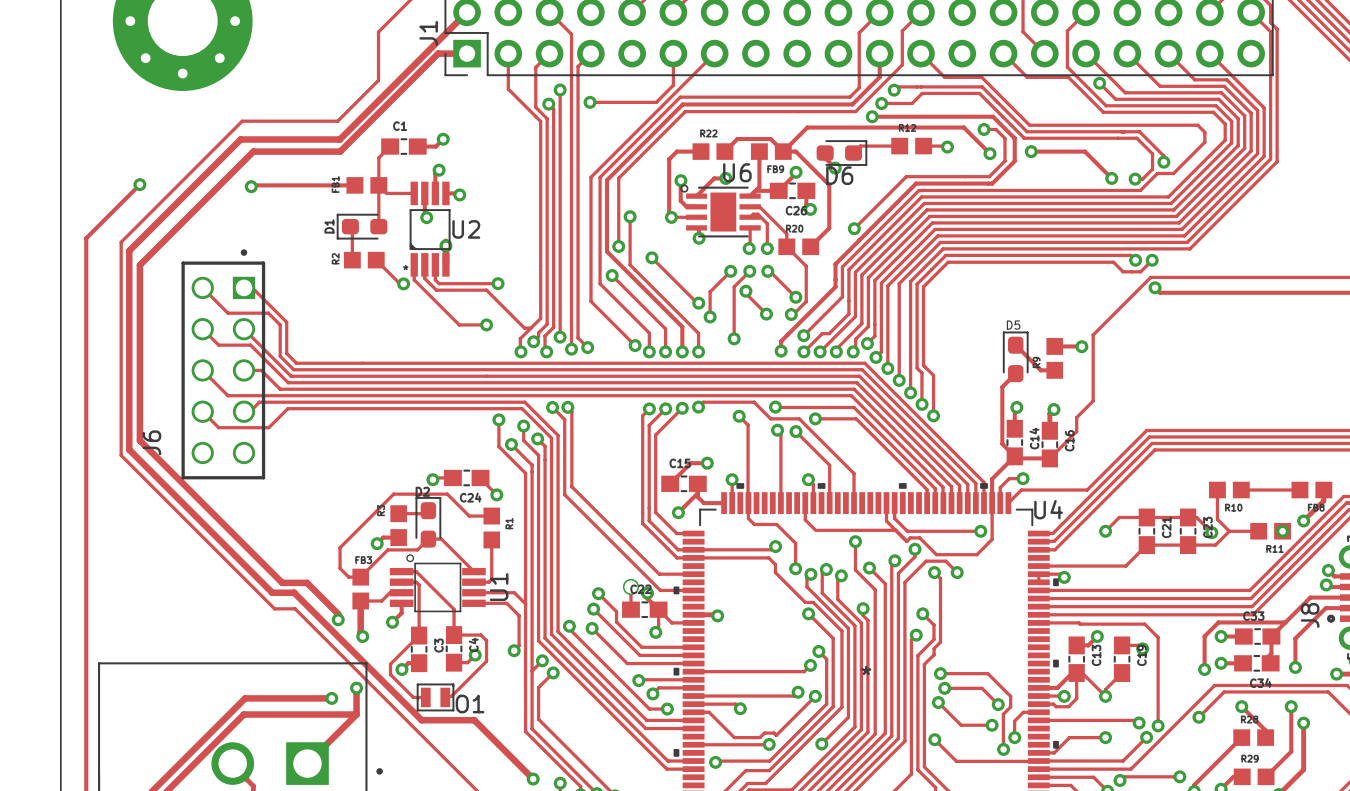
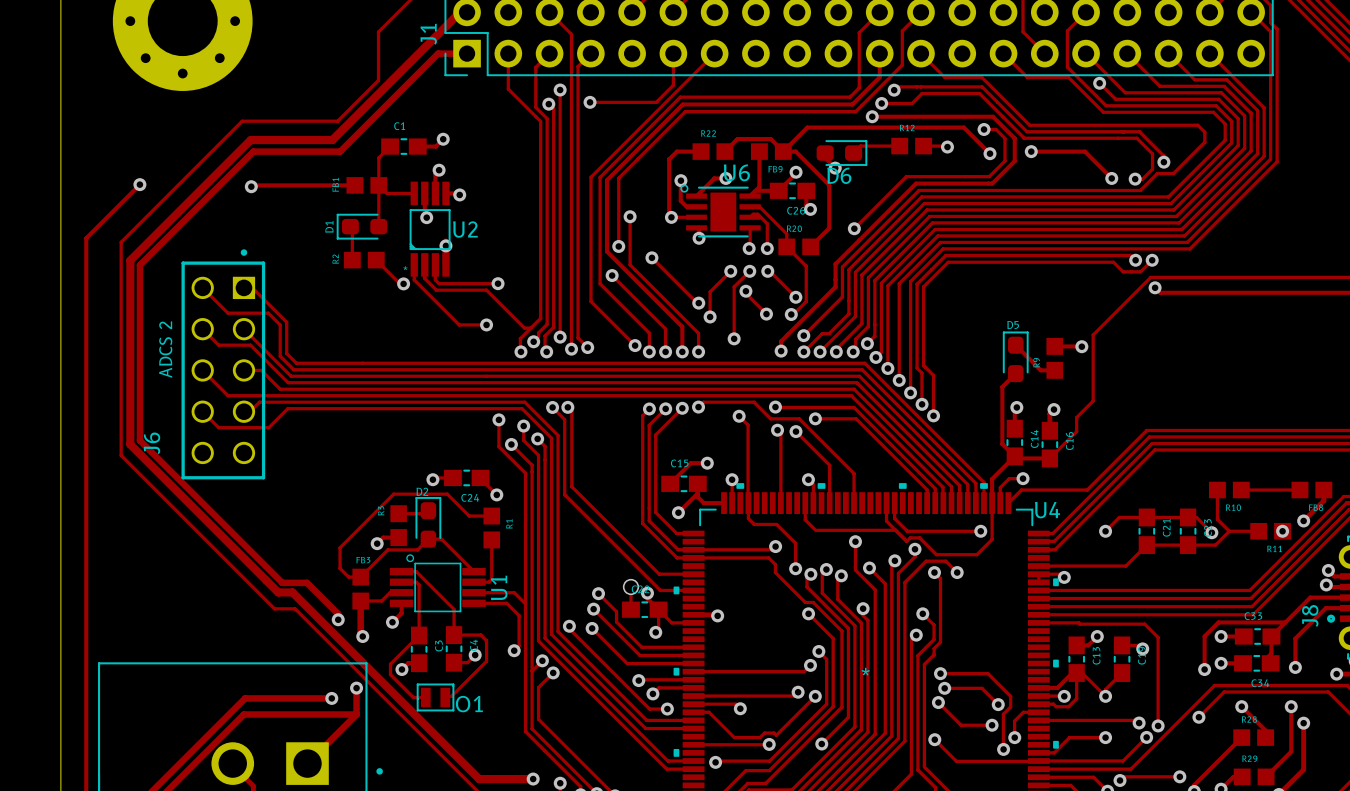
track: (467, 12) (339, 139) (240, 139) (129, 250) (129, 449) (272, 592) (294, 592) (421, 720) (474, 720) (533, 779) -> (467, 12) (460, 12) (332, 140) (250, 140) (130, 260) (130, 444) (278, 592) (292, 592) (479, 779) (533, 779)
text: none -> ADCS 2 (165, 349)

